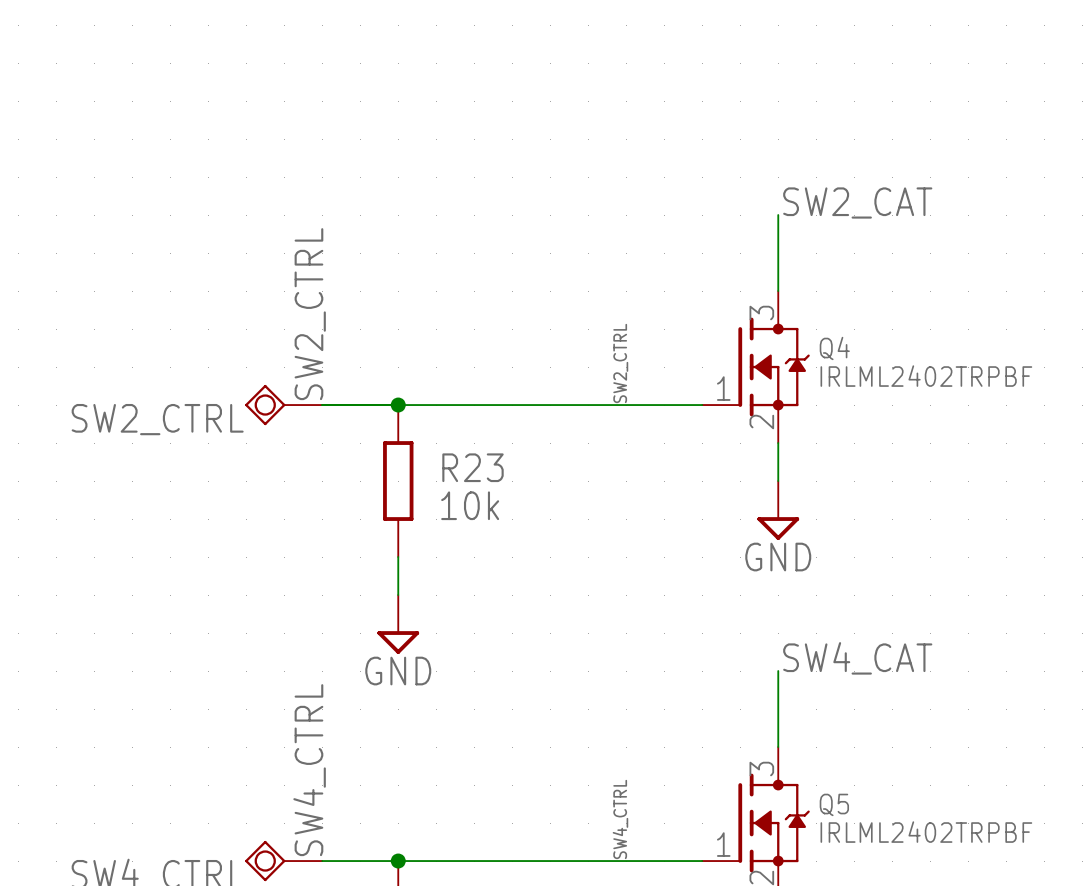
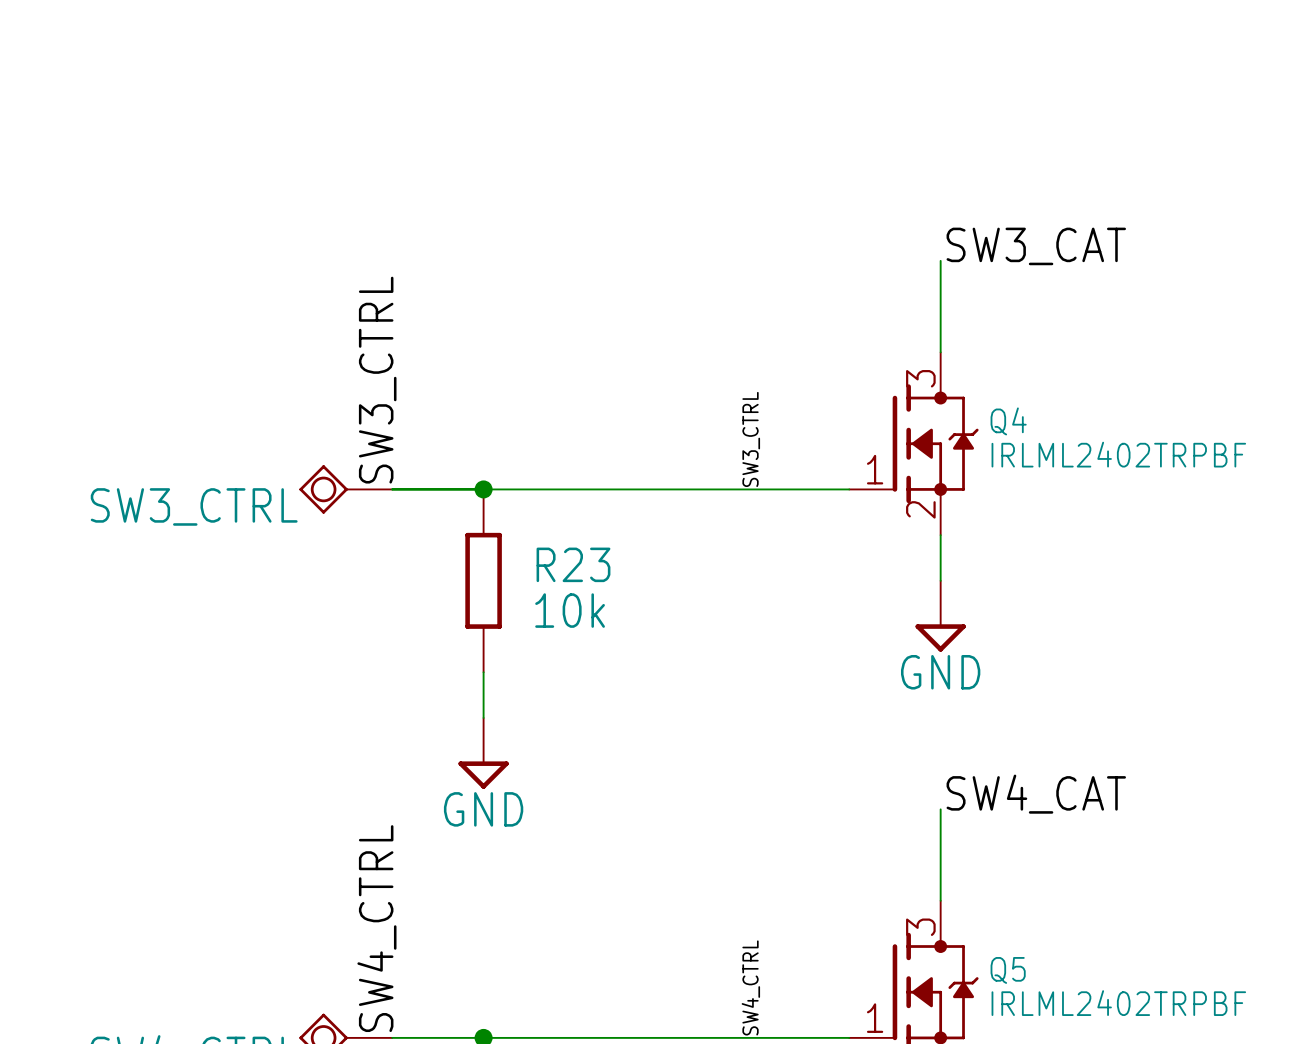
label: SW2_CAT (857, 203) -> SW3_CAT (1036, 246)
label: SW2_CTRL (310, 314) -> SW3_CTRL (377, 380)
label: SW2_CTRL (620, 363) -> SW3_CTRL (751, 439)
SW2_CTRL name: SW2_CTRL (157, 419) -> SW3_CTRL (194, 506)

